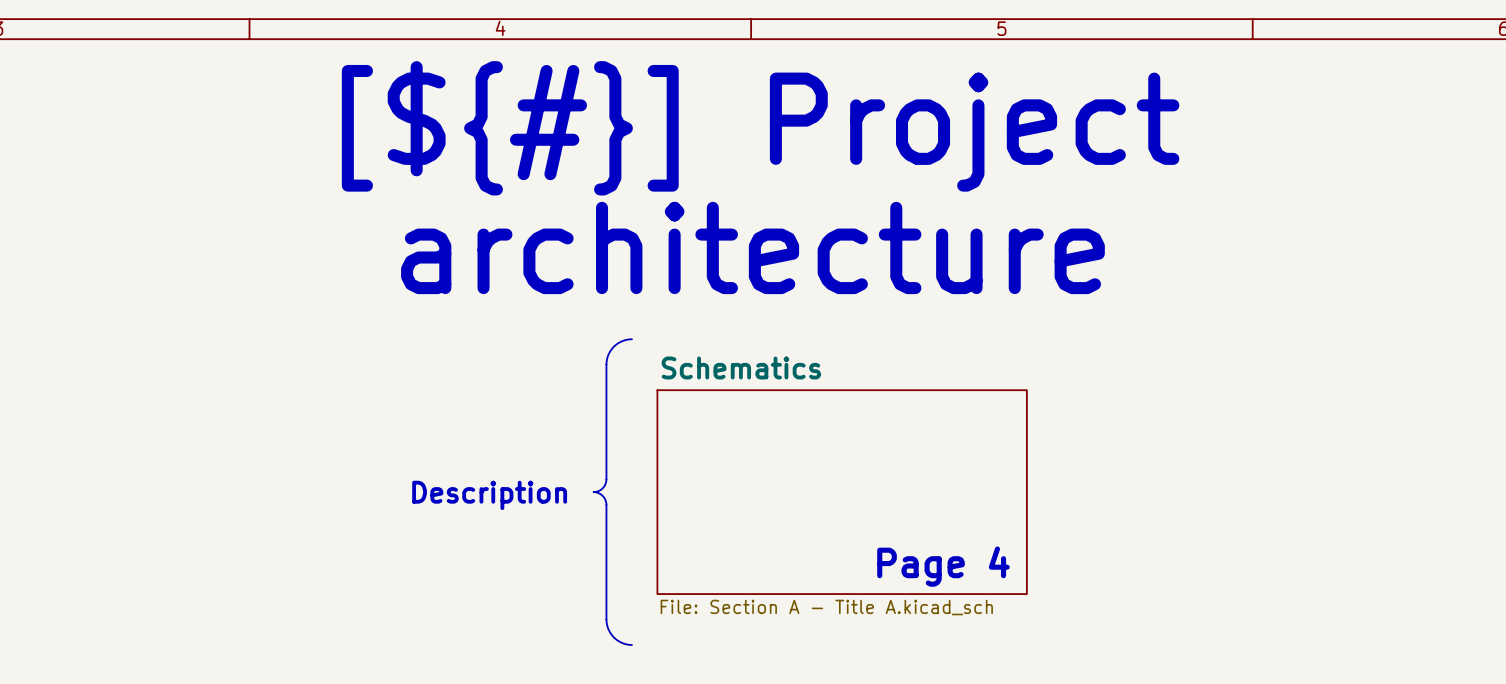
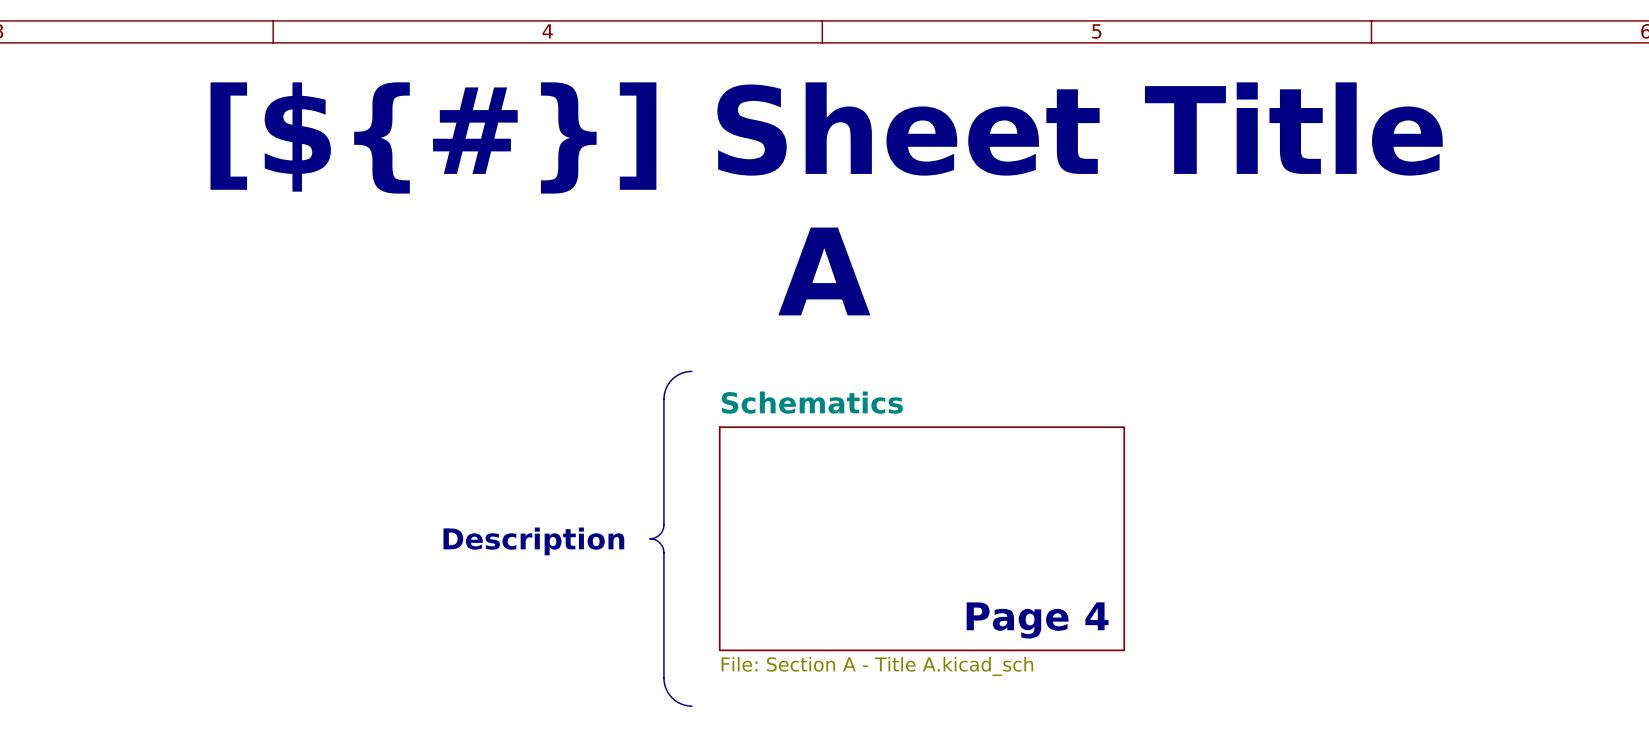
text: [${#}] Project (760, 128) -> [${#}] Sheet Title (826, 137)
text: architecture (752, 247) -> A (824, 271)

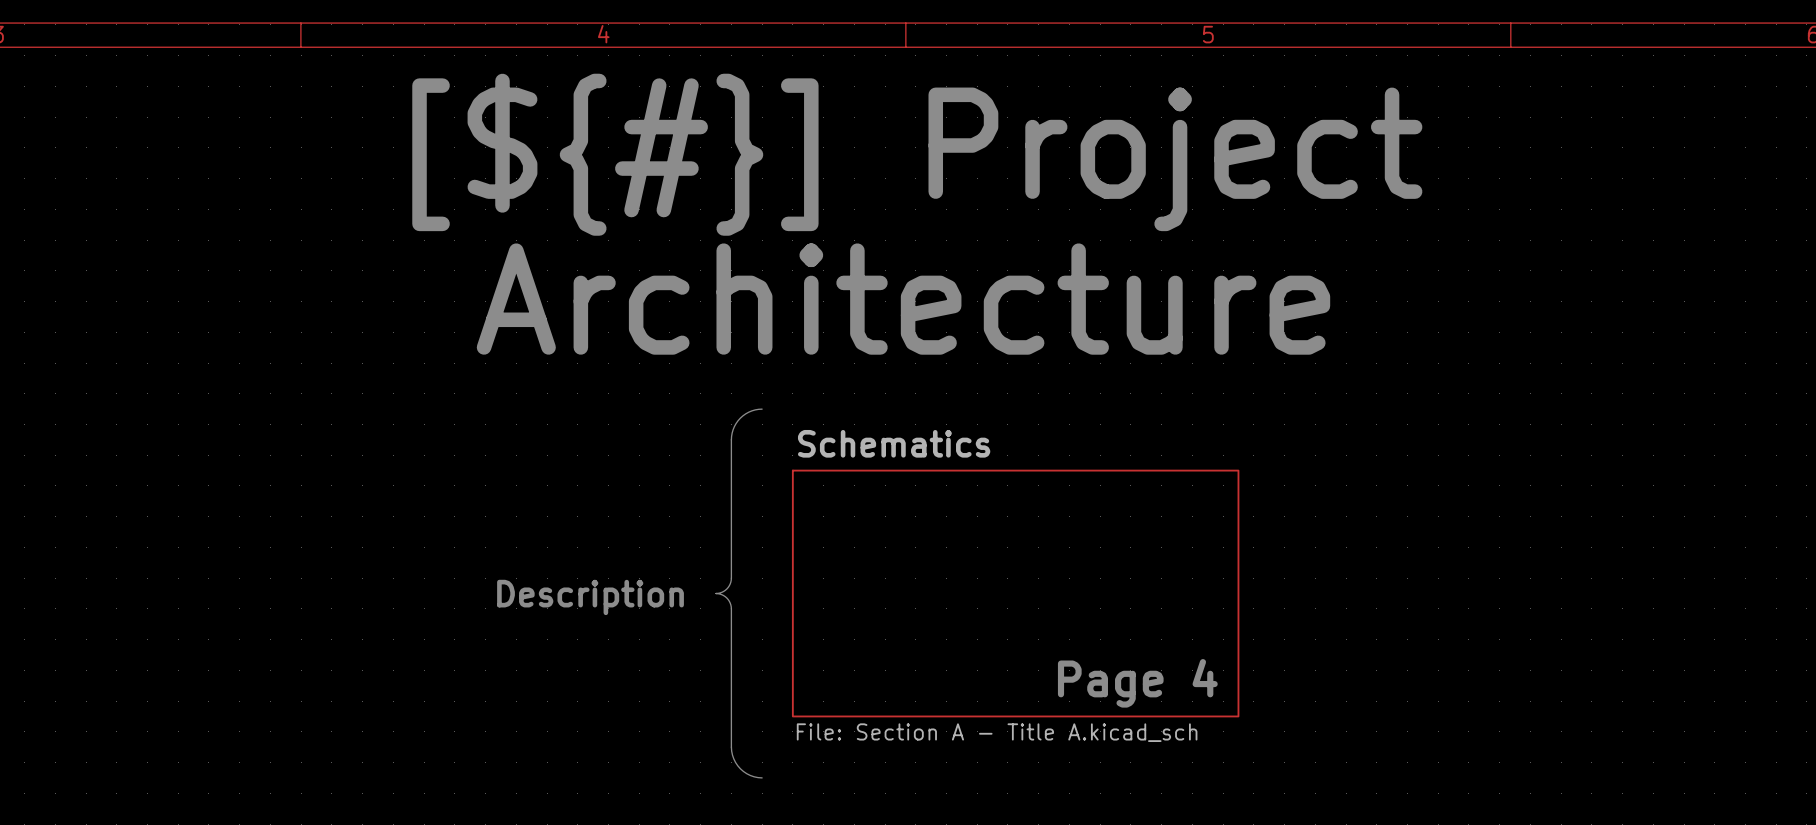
text: [${#}] Sheet Title (826, 137) -> [${#}] Project (917, 154)
text: A (824, 271) -> Architecture (903, 299)

